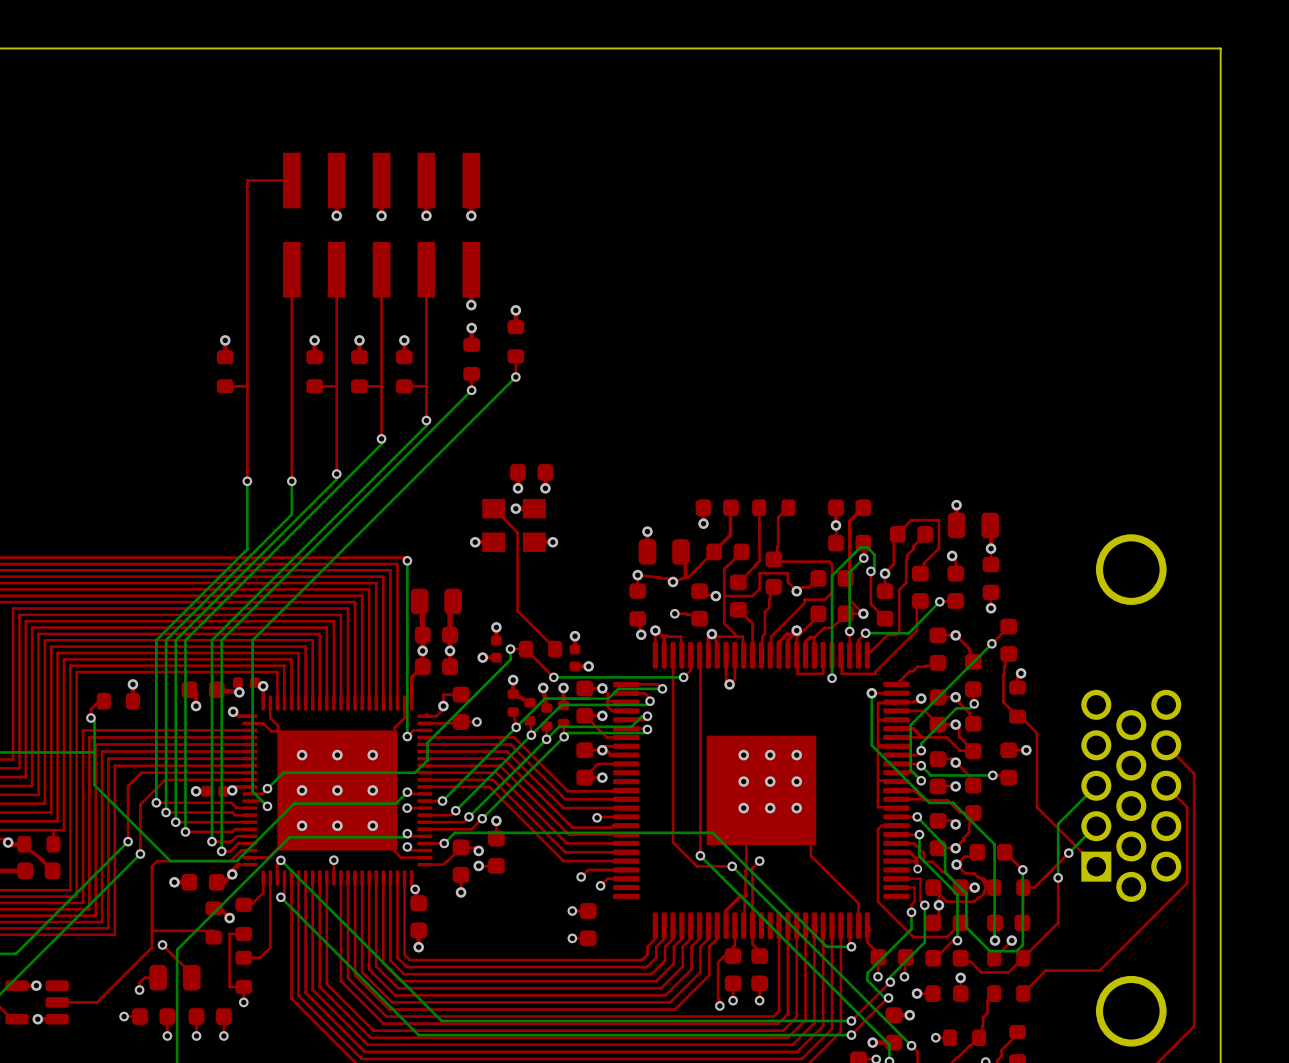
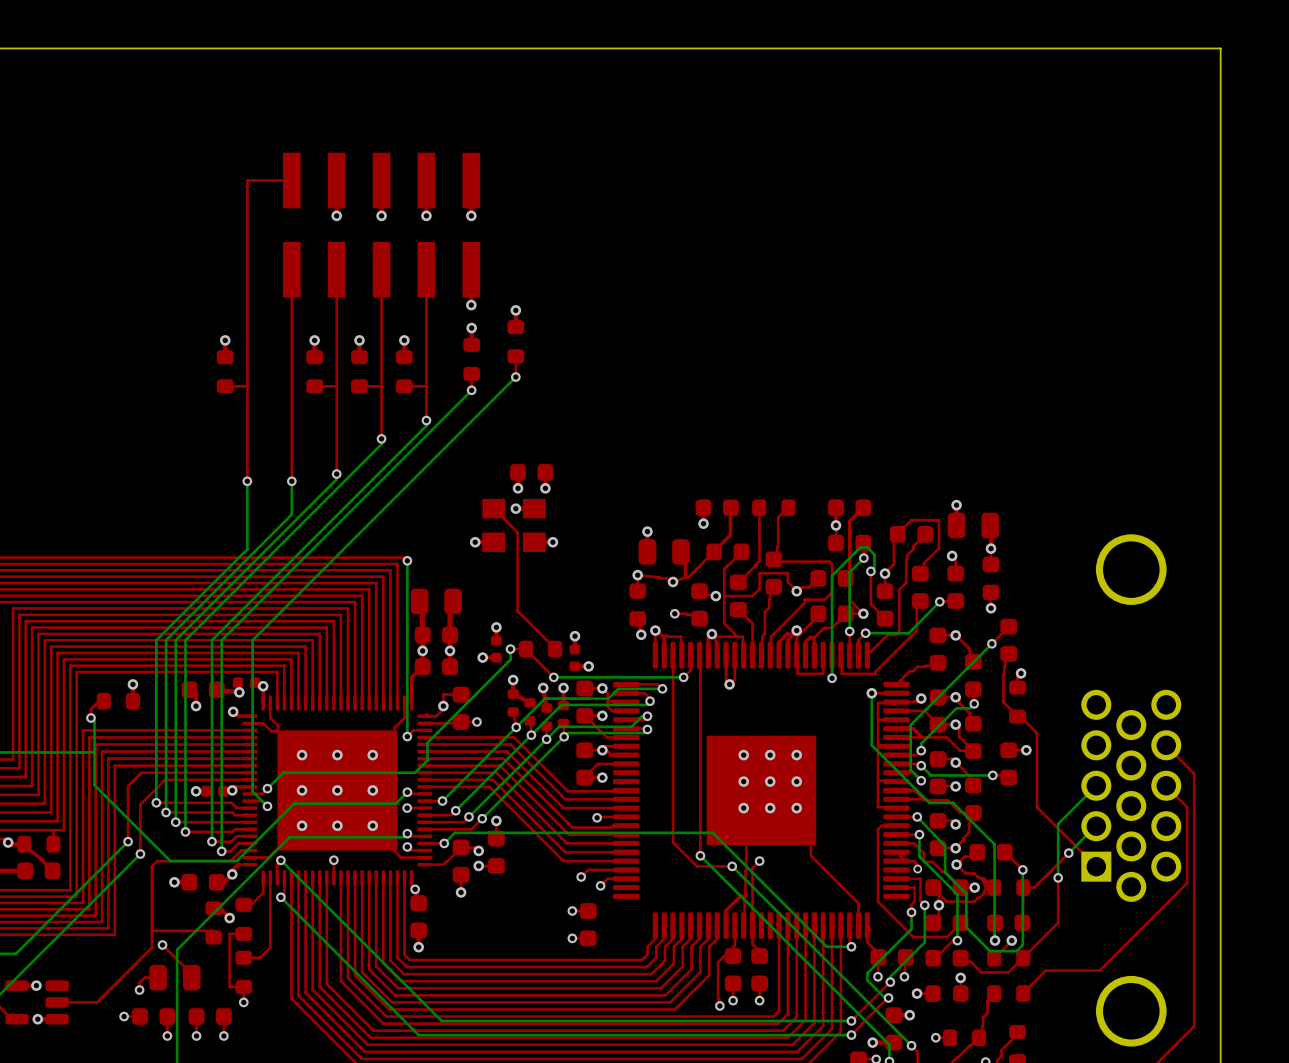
top track: (896, 852) (909, 852) (916, 859) (916, 864) -> (896, 852) (905, 861)

